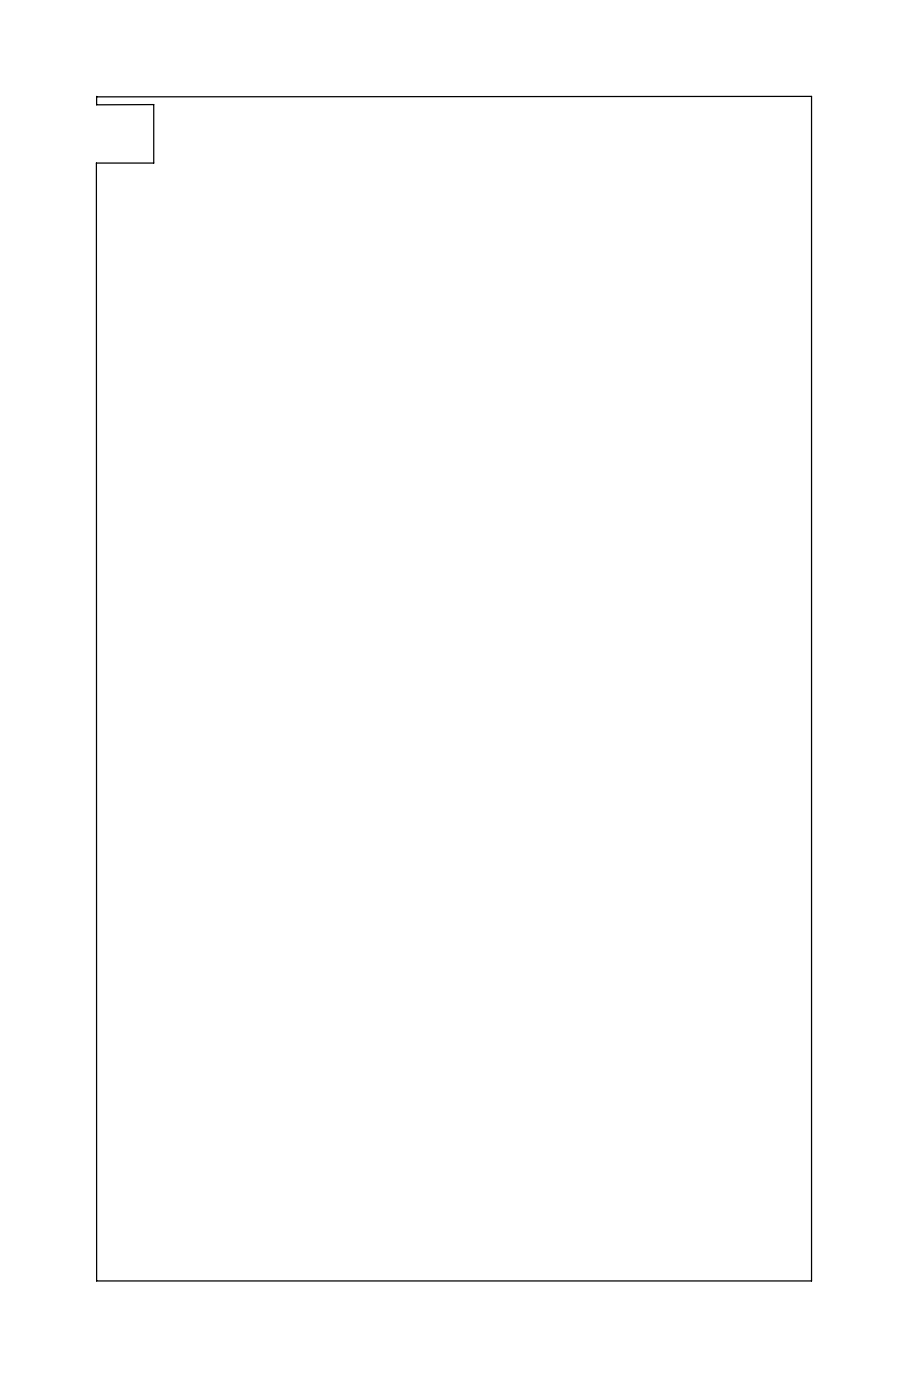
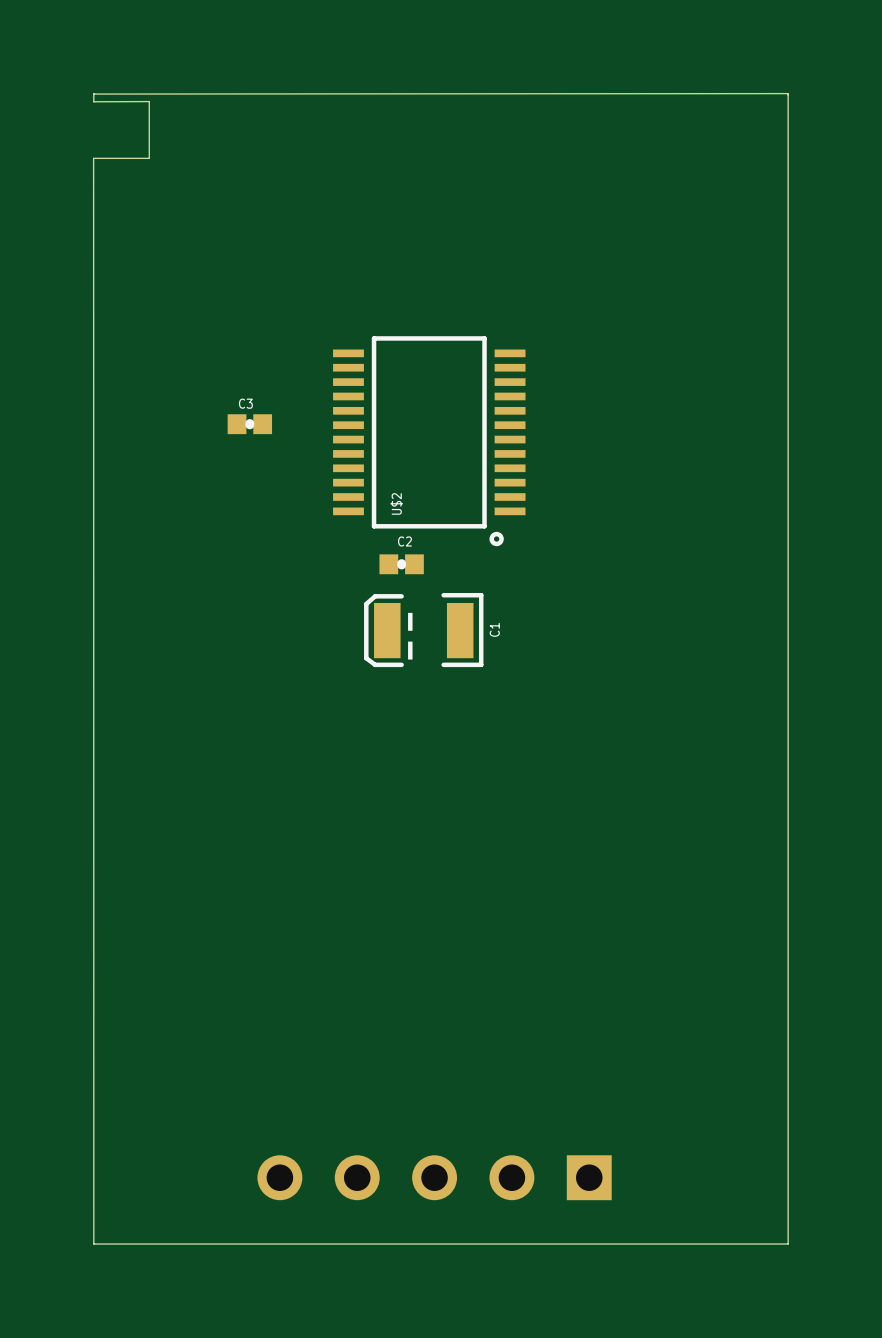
C3: none -> (249, 424)
U$2: none -> (429, 441)
C2: none -> (401, 564)
C1: none -> (423, 630)
part: none -> (434, 1177)

